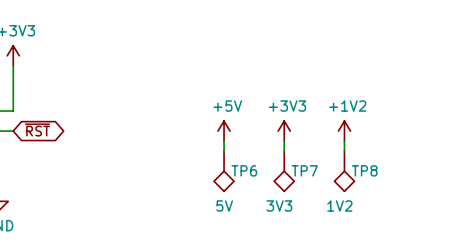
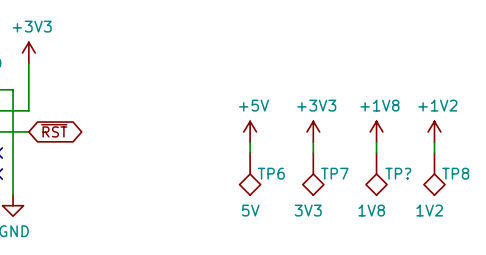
power symbol: +1V2 (344, 131) -> +1V8 (376, 131)
power symbol: none -> +1V2 (434, 131)
wire: none -> (434, 142) (434, 153)
TP8 name: TP8 (364, 170) -> TP? (398, 173)
TP8: none -> 1V2 (434, 174)
TP8 value: 1V2 (339, 205) -> 1V8 (371, 210)

